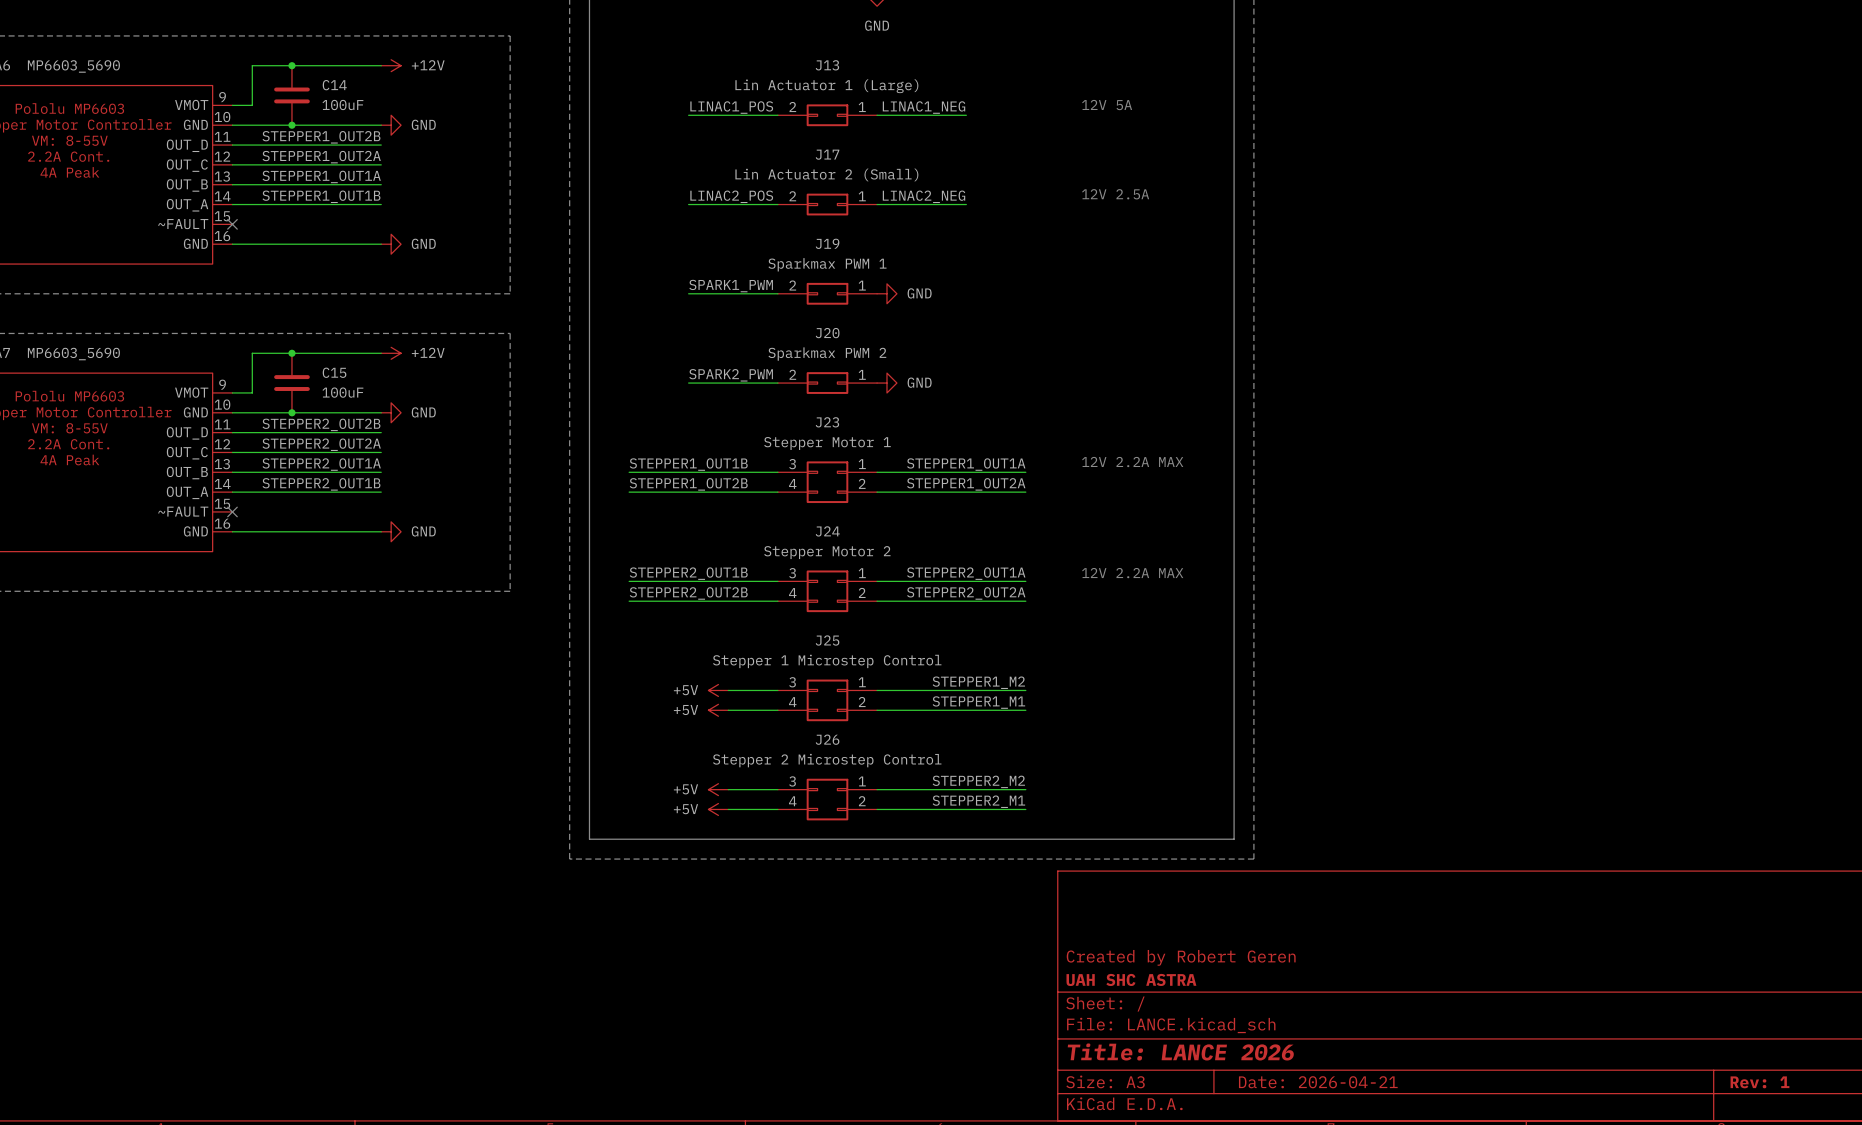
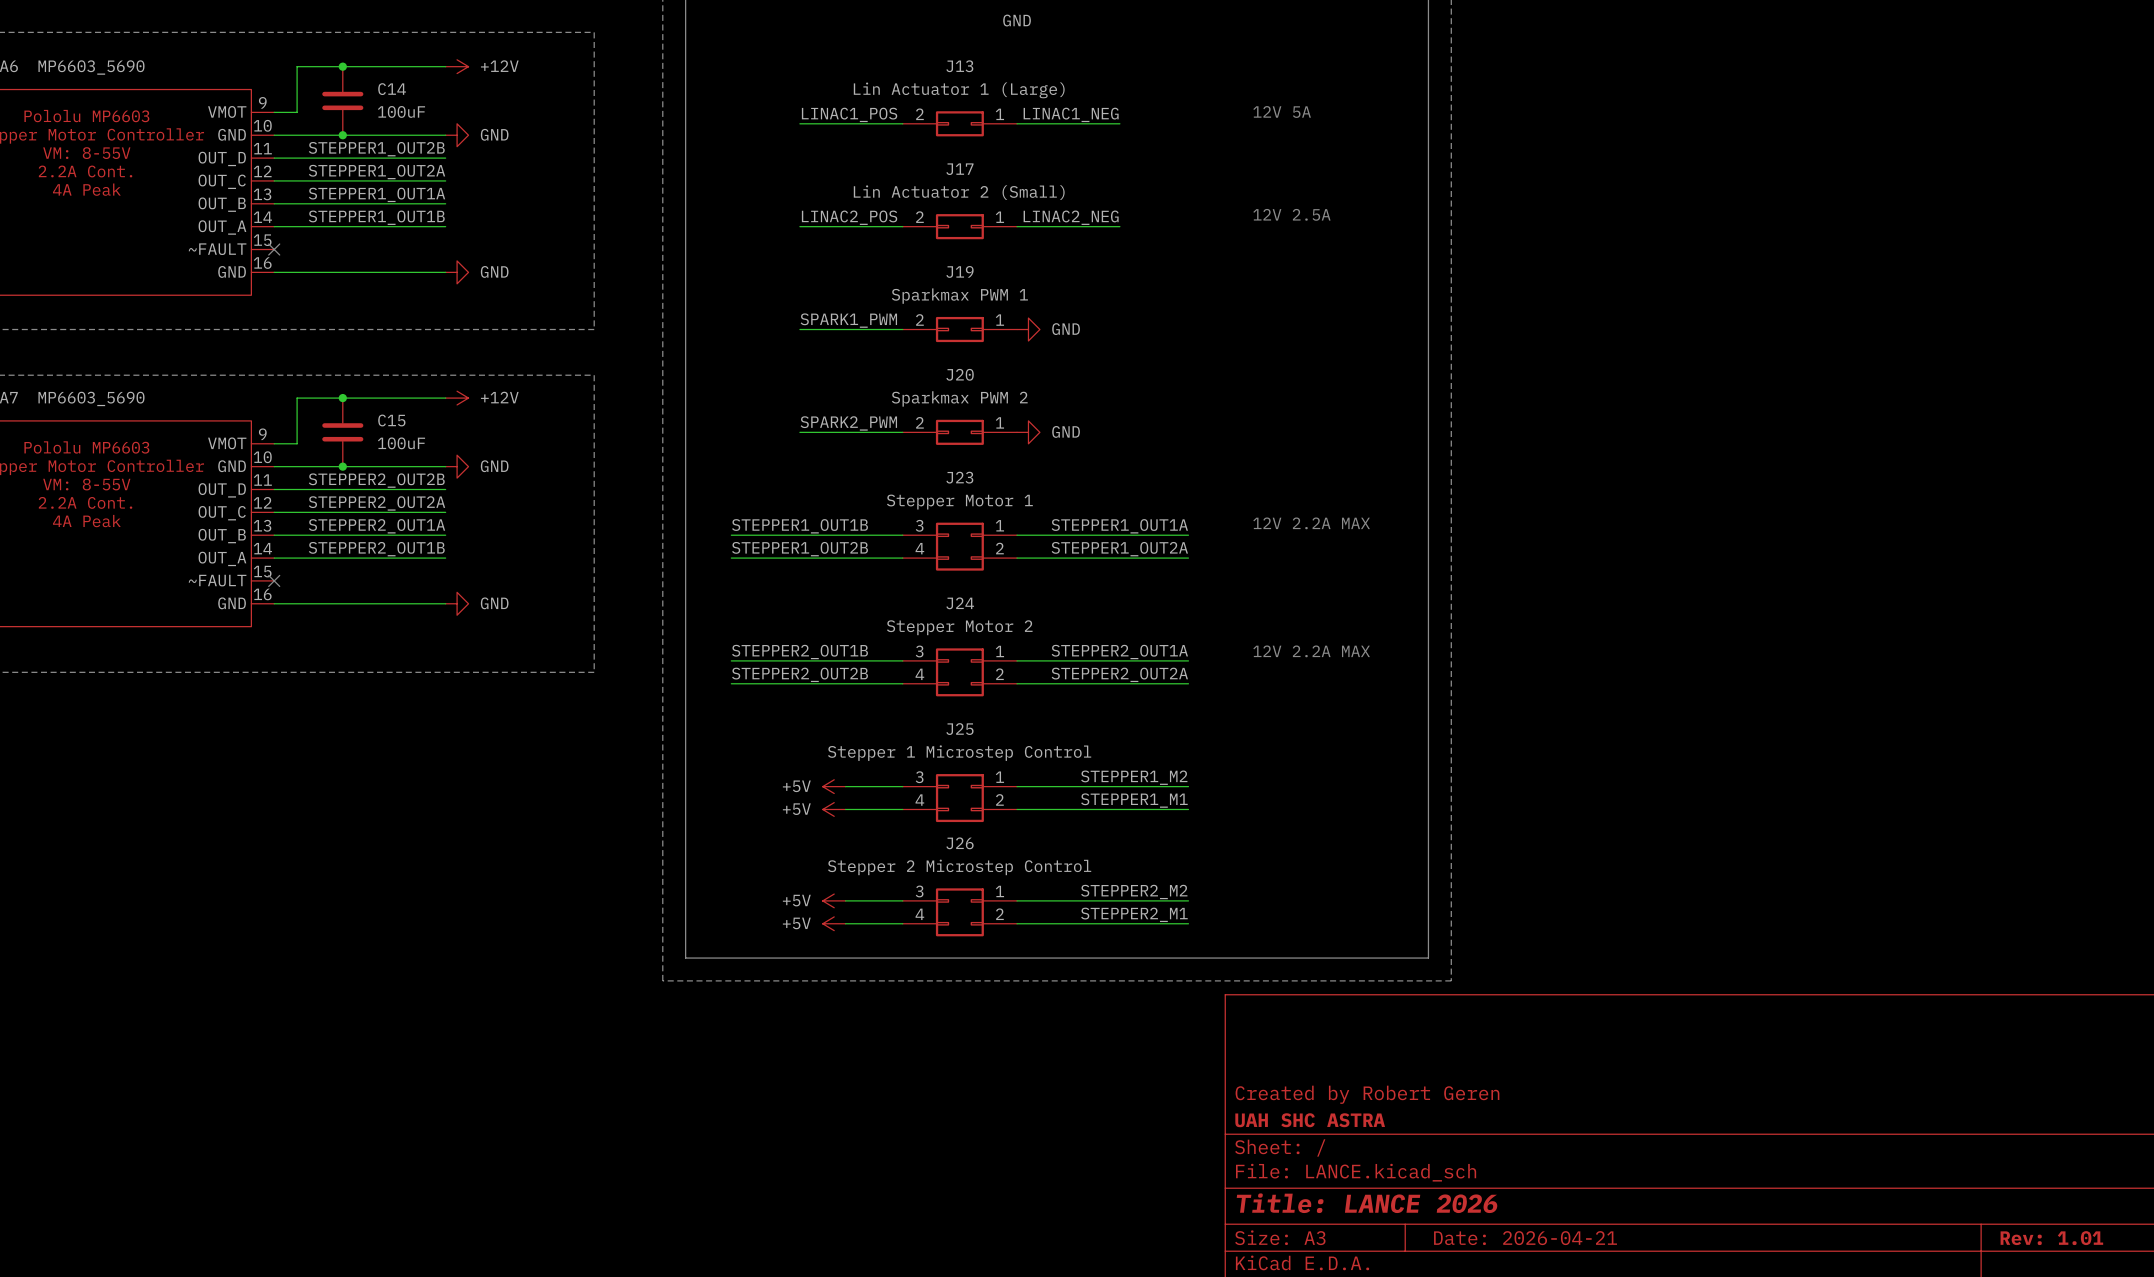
title block: Rev: 1 (1759, 1082) -> Rev: 1.01 (2051, 1238)

